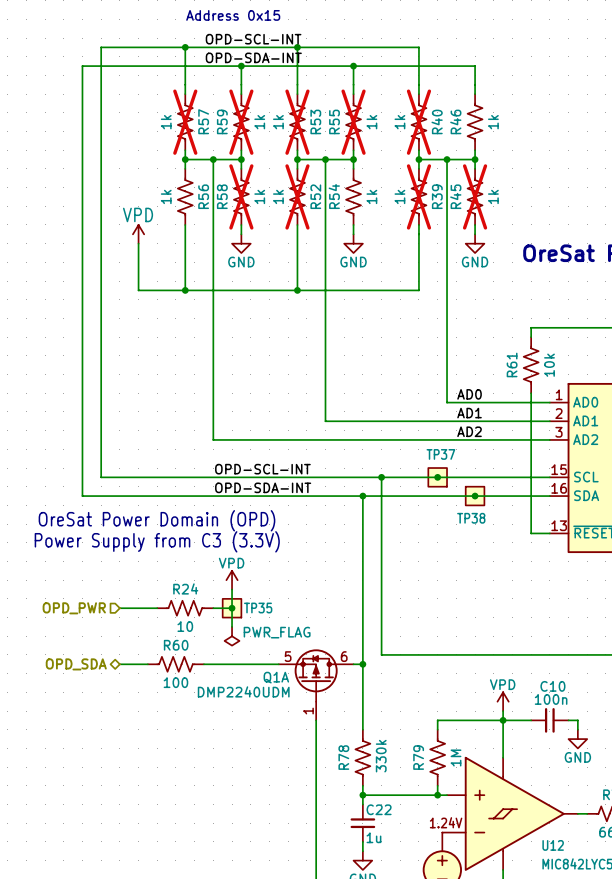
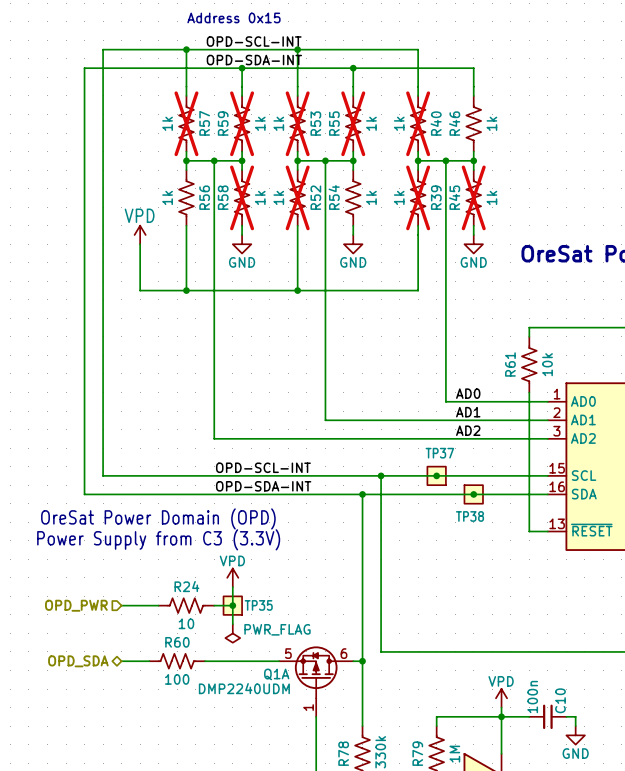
C10 name rotation: 0° (552, 686) -> 90° counterclockwise (560, 700)
C10 value rotation: 0° (551, 699) -> 90° counterclockwise (532, 697)

